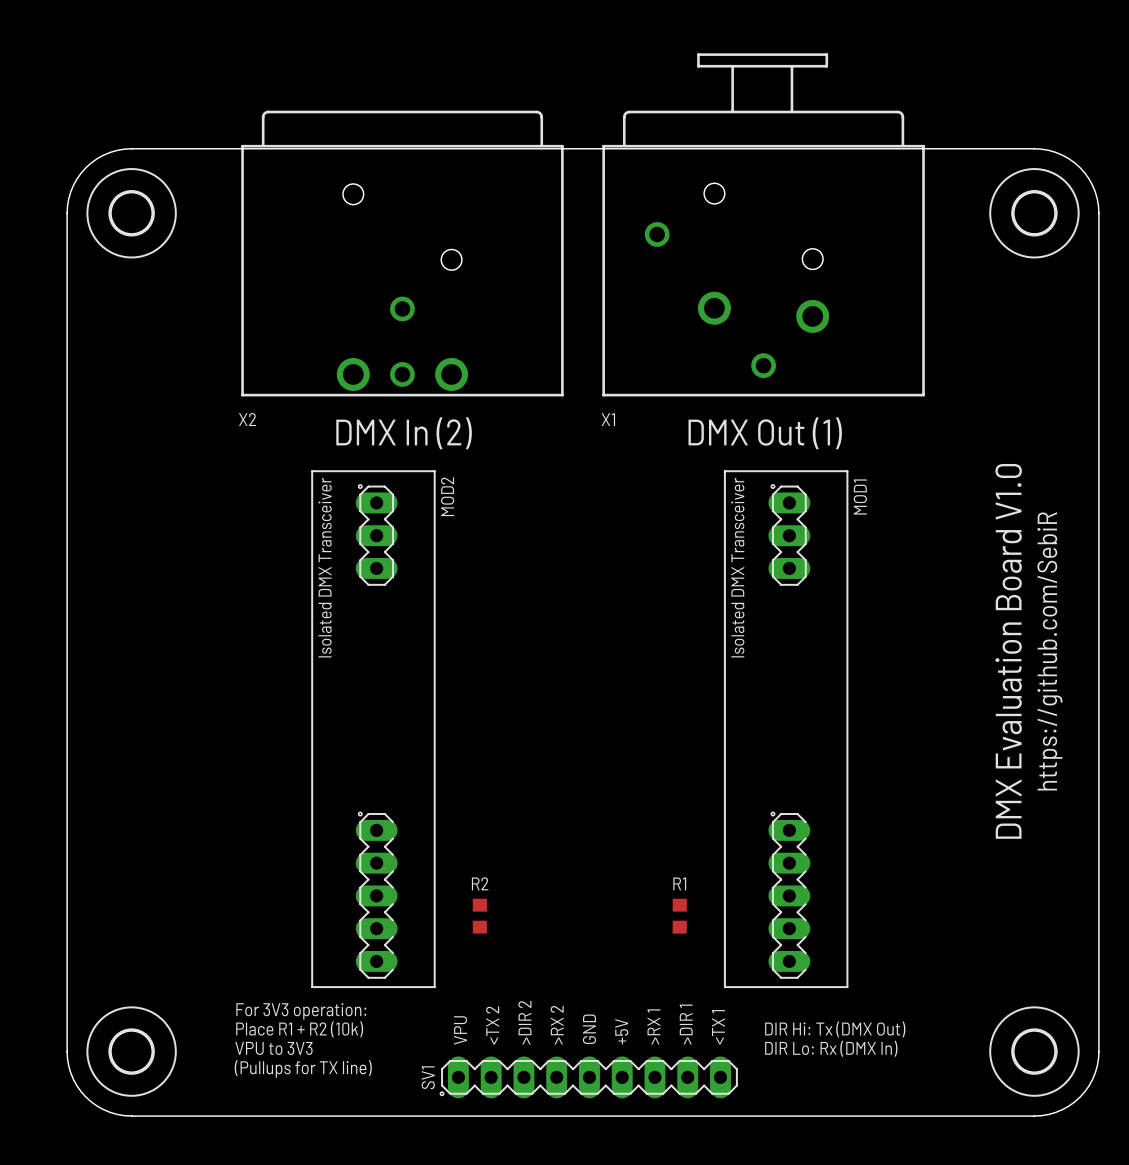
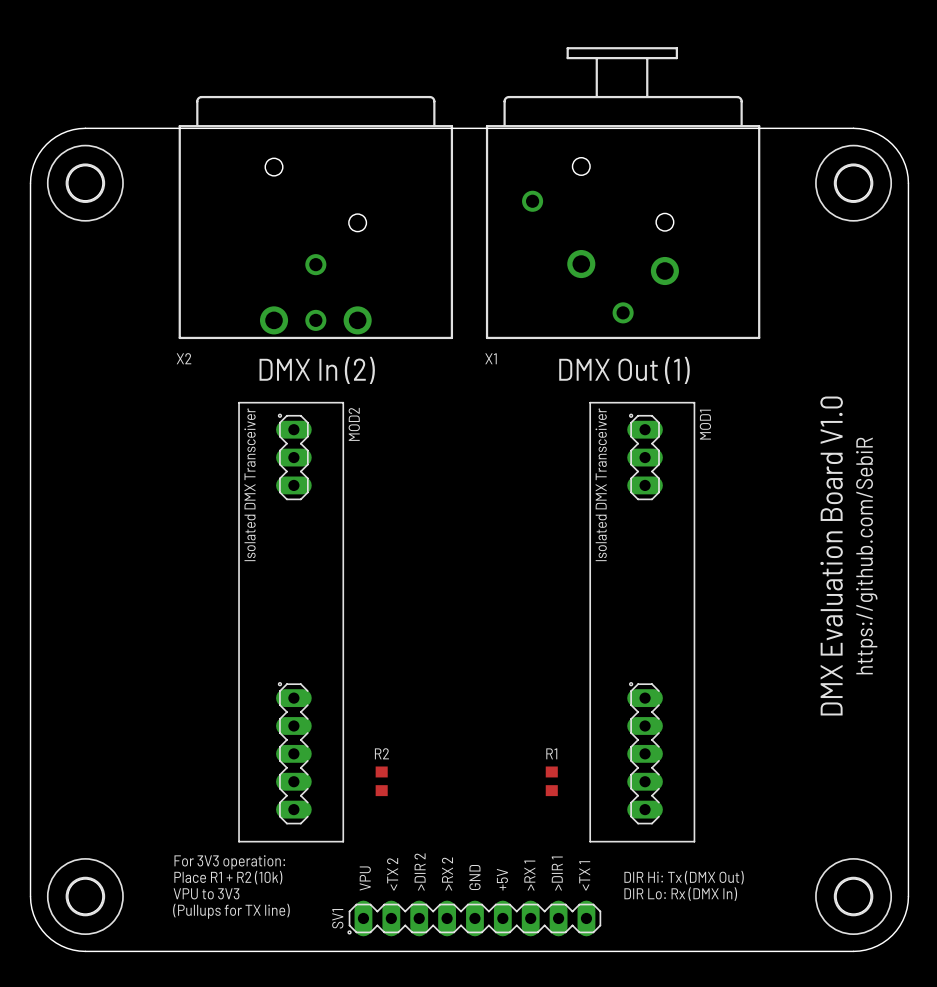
MOD2 footprint: [311, 470, 436, 989] -> [238, 401, 345, 843]
MOD1 footprint: [723, 470, 849, 989] -> [589, 401, 696, 843]

